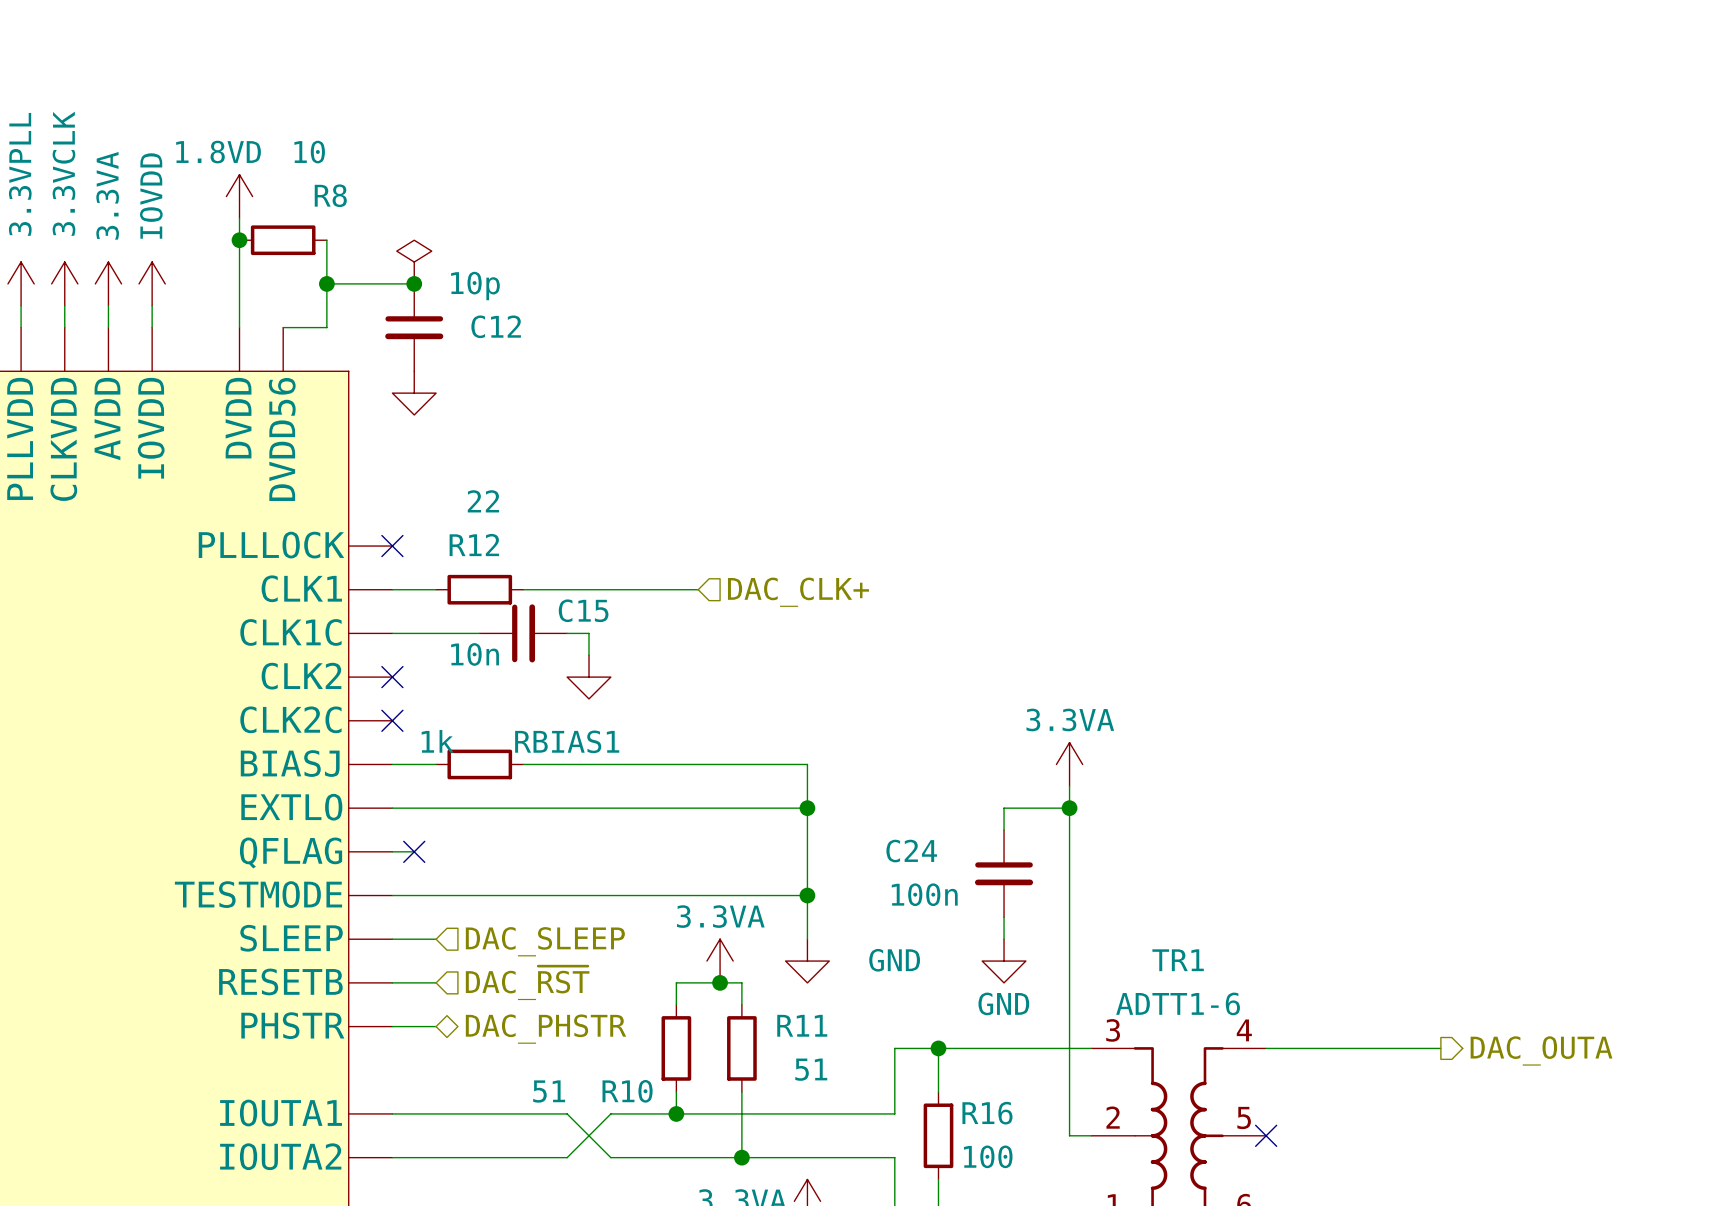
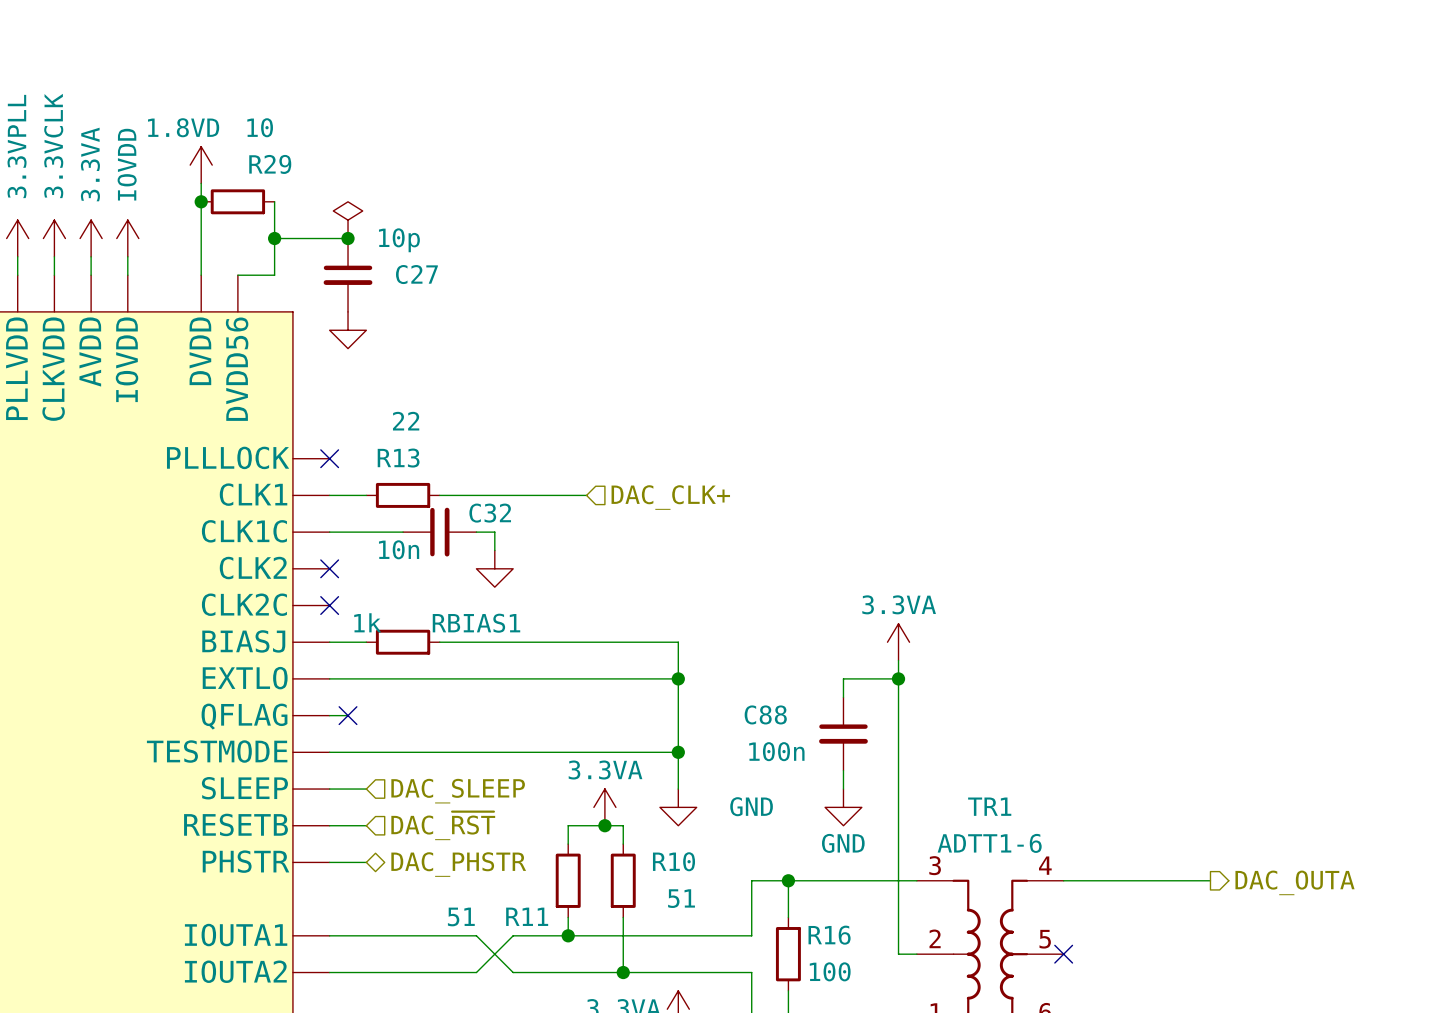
R8 name: R8 (330, 195) -> R29 (270, 164)
C12 name: C12 (496, 326) -> C27 (416, 274)
R12 name: R12 (474, 545) -> R13 (398, 458)
C15 name: C15 (583, 610) -> C32 (490, 513)
C24 name: C24 (911, 851) -> C88 (765, 714)
R11 name: R11 (802, 1025) -> R10 (674, 861)
R10 name: R10 (627, 1091) -> R11 (527, 916)

